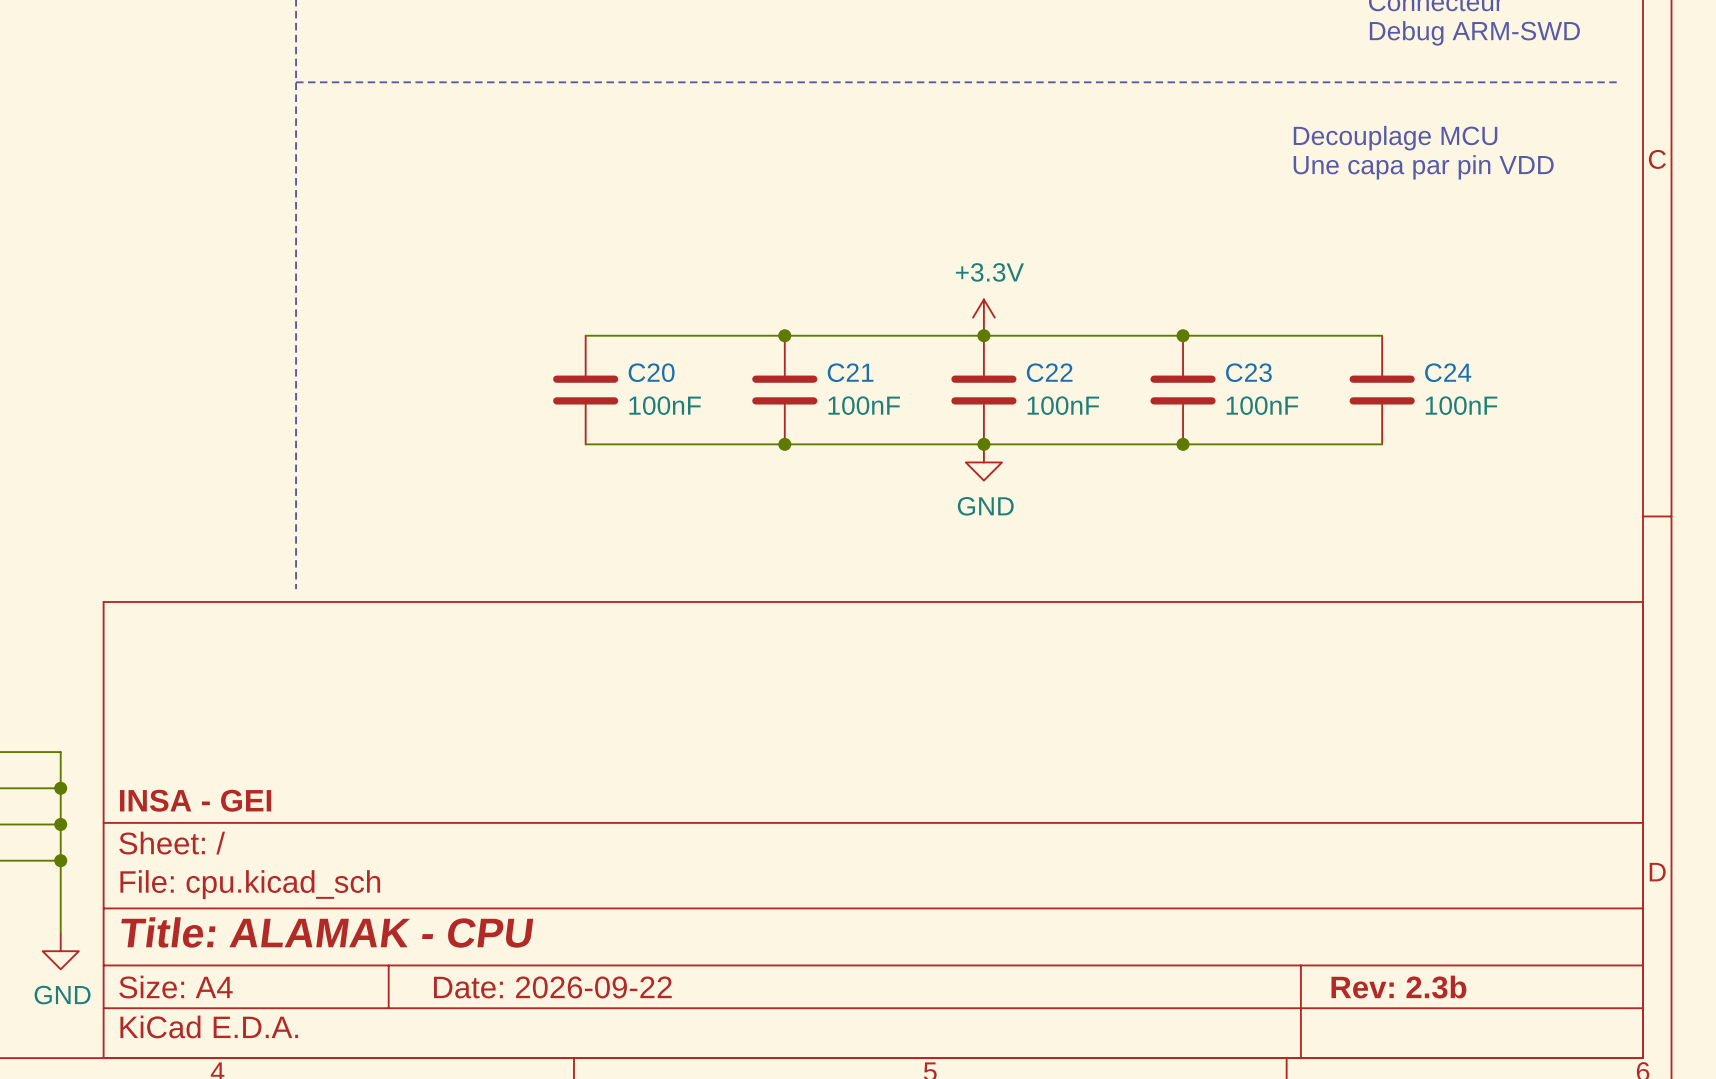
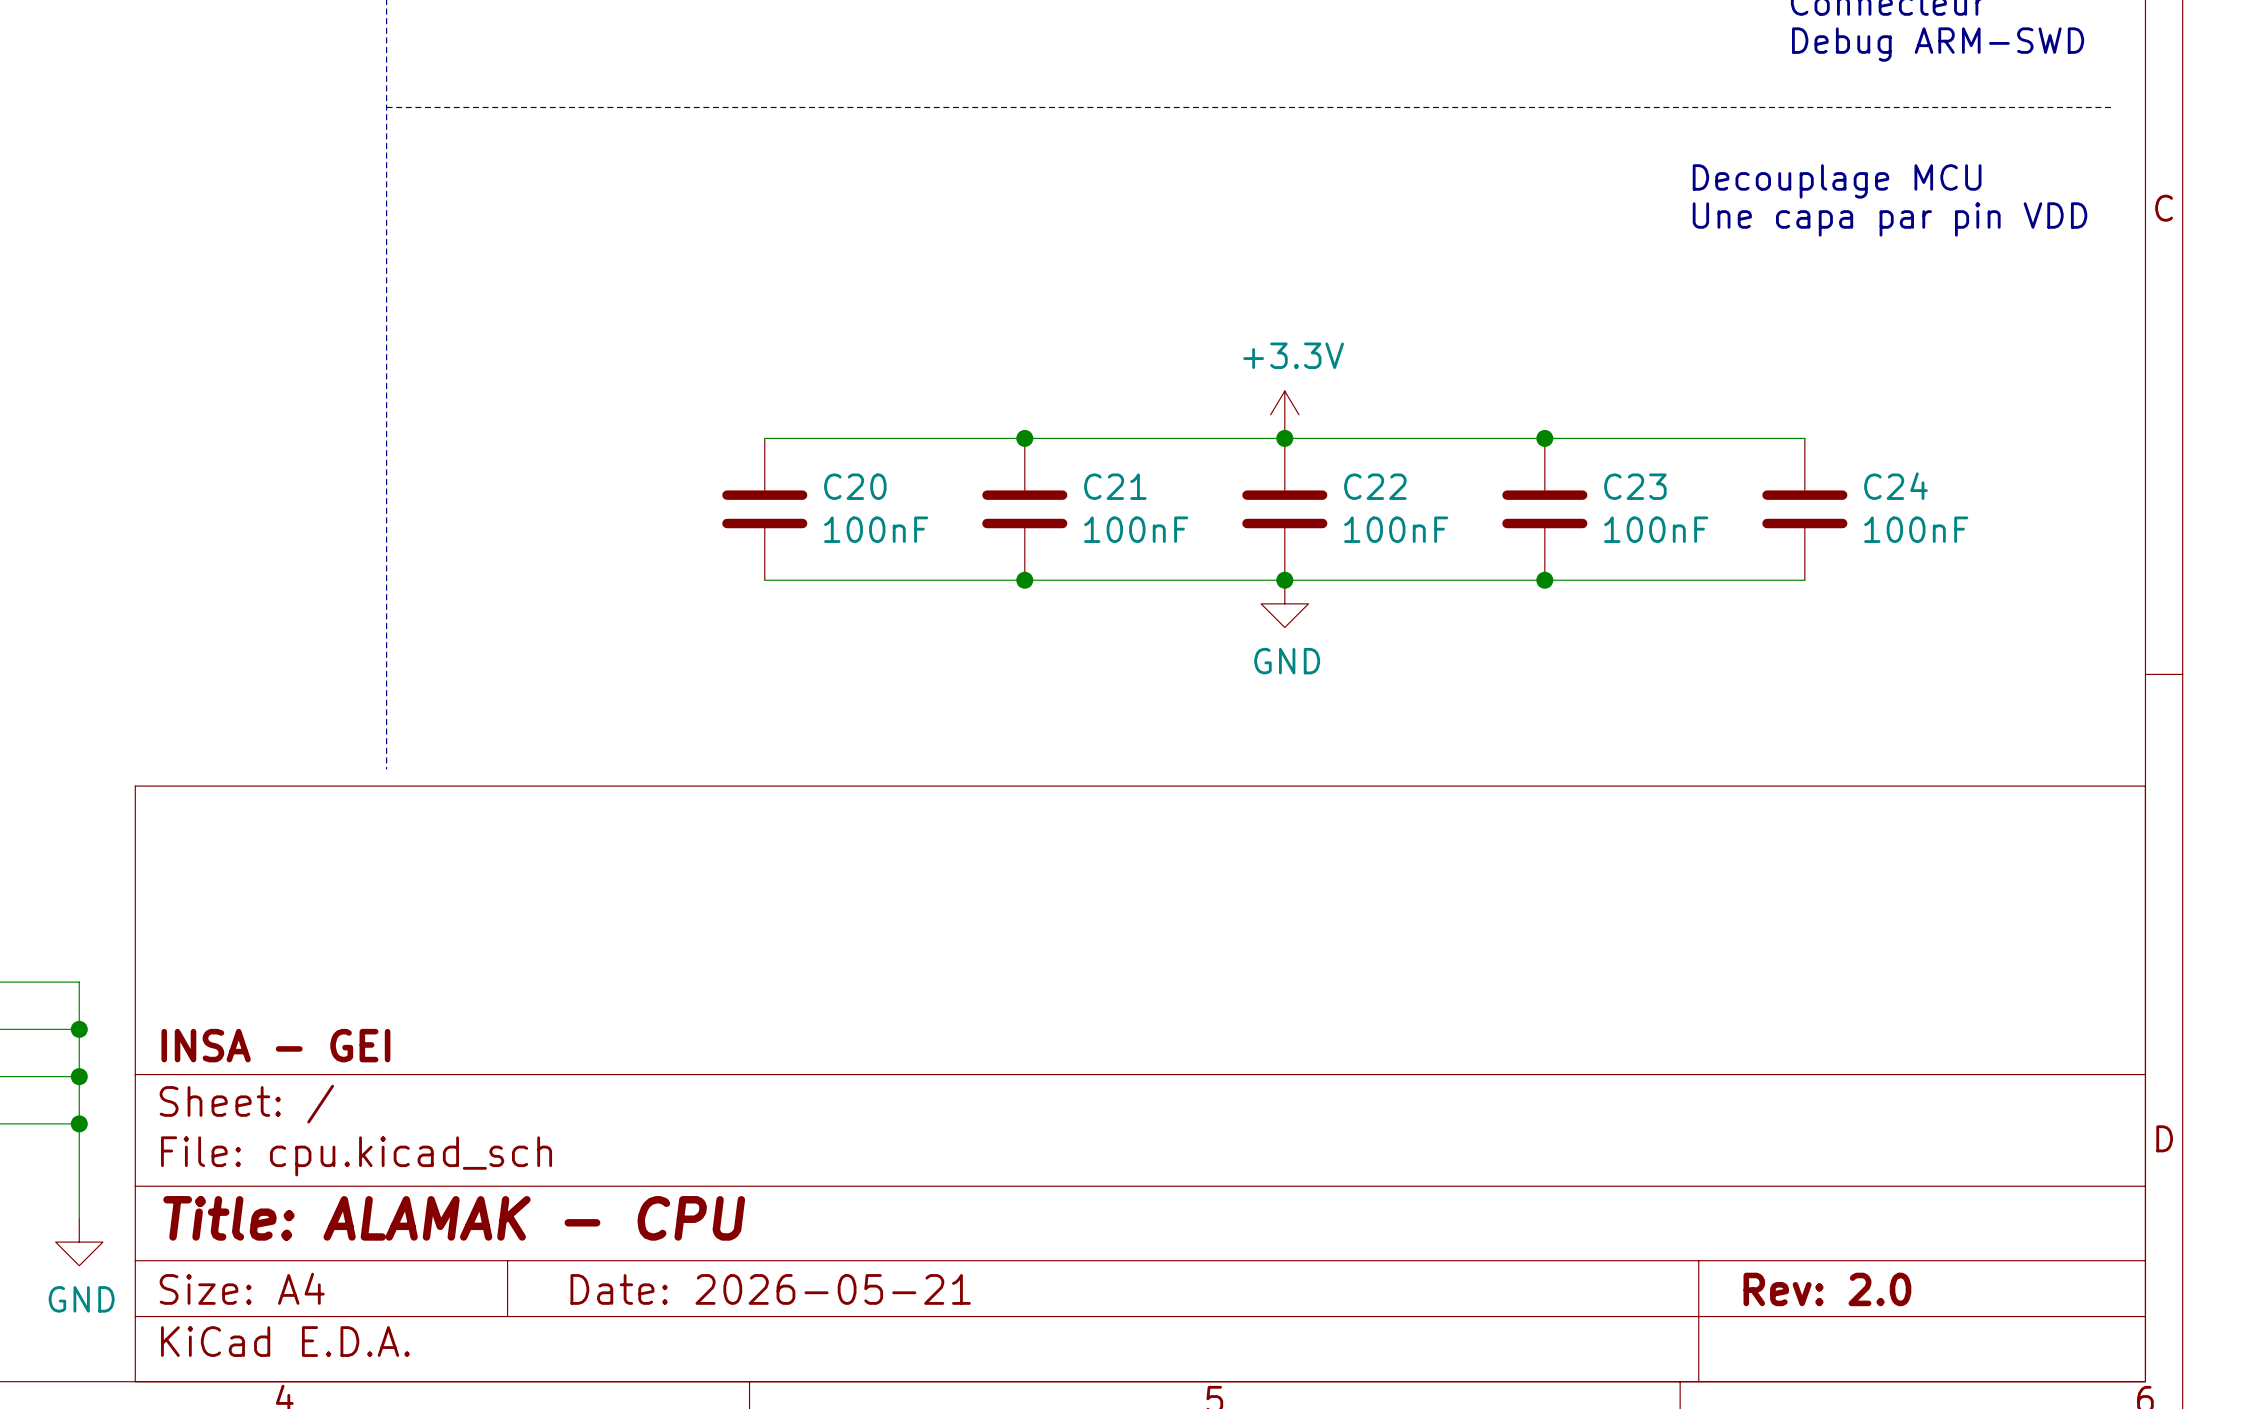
title block: Date: 2026-09-22 (552, 987) -> Date: 2026-05-21 (770, 1289)
title block: Rev: 2.3b (1398, 987) -> Rev: 2.0 (1827, 1289)

